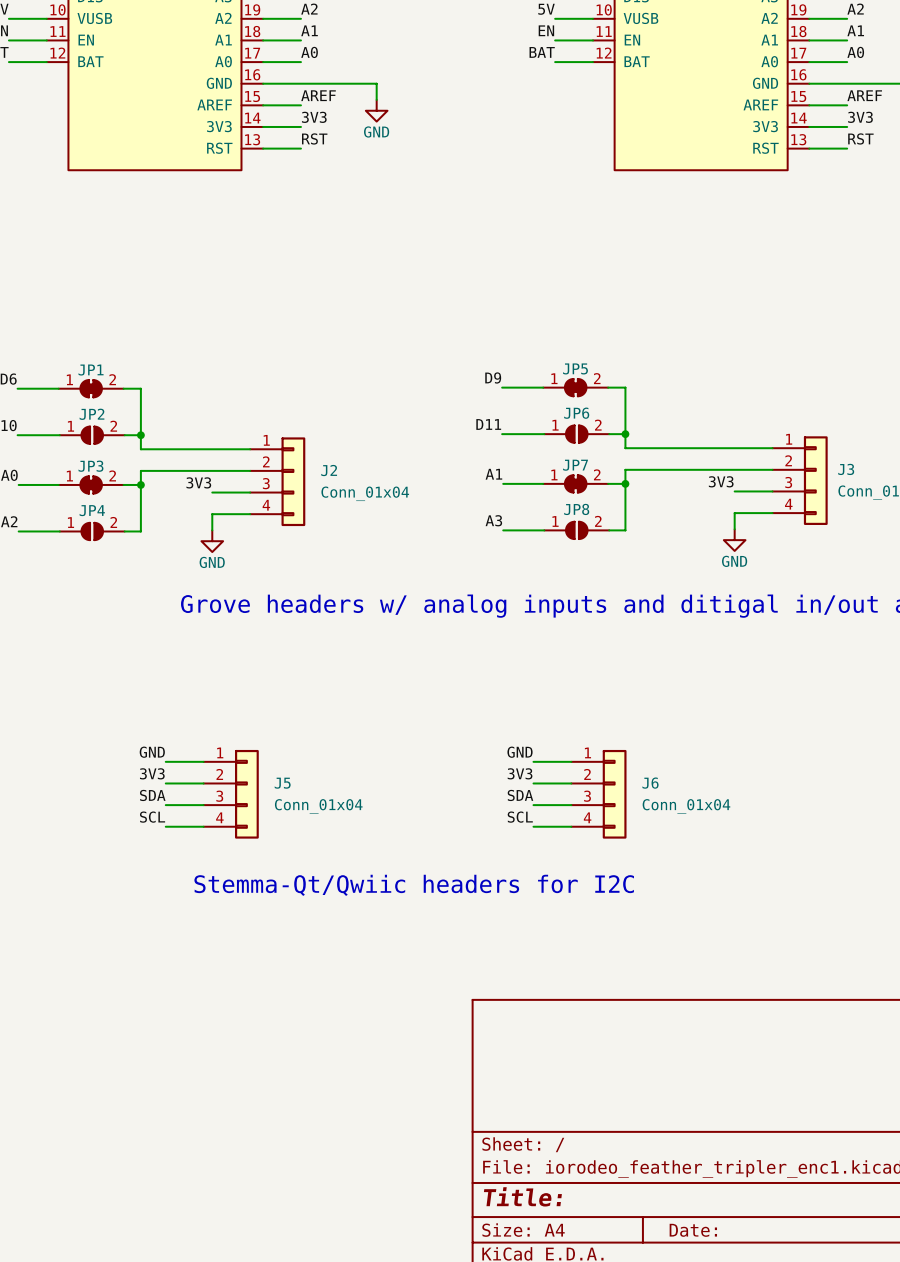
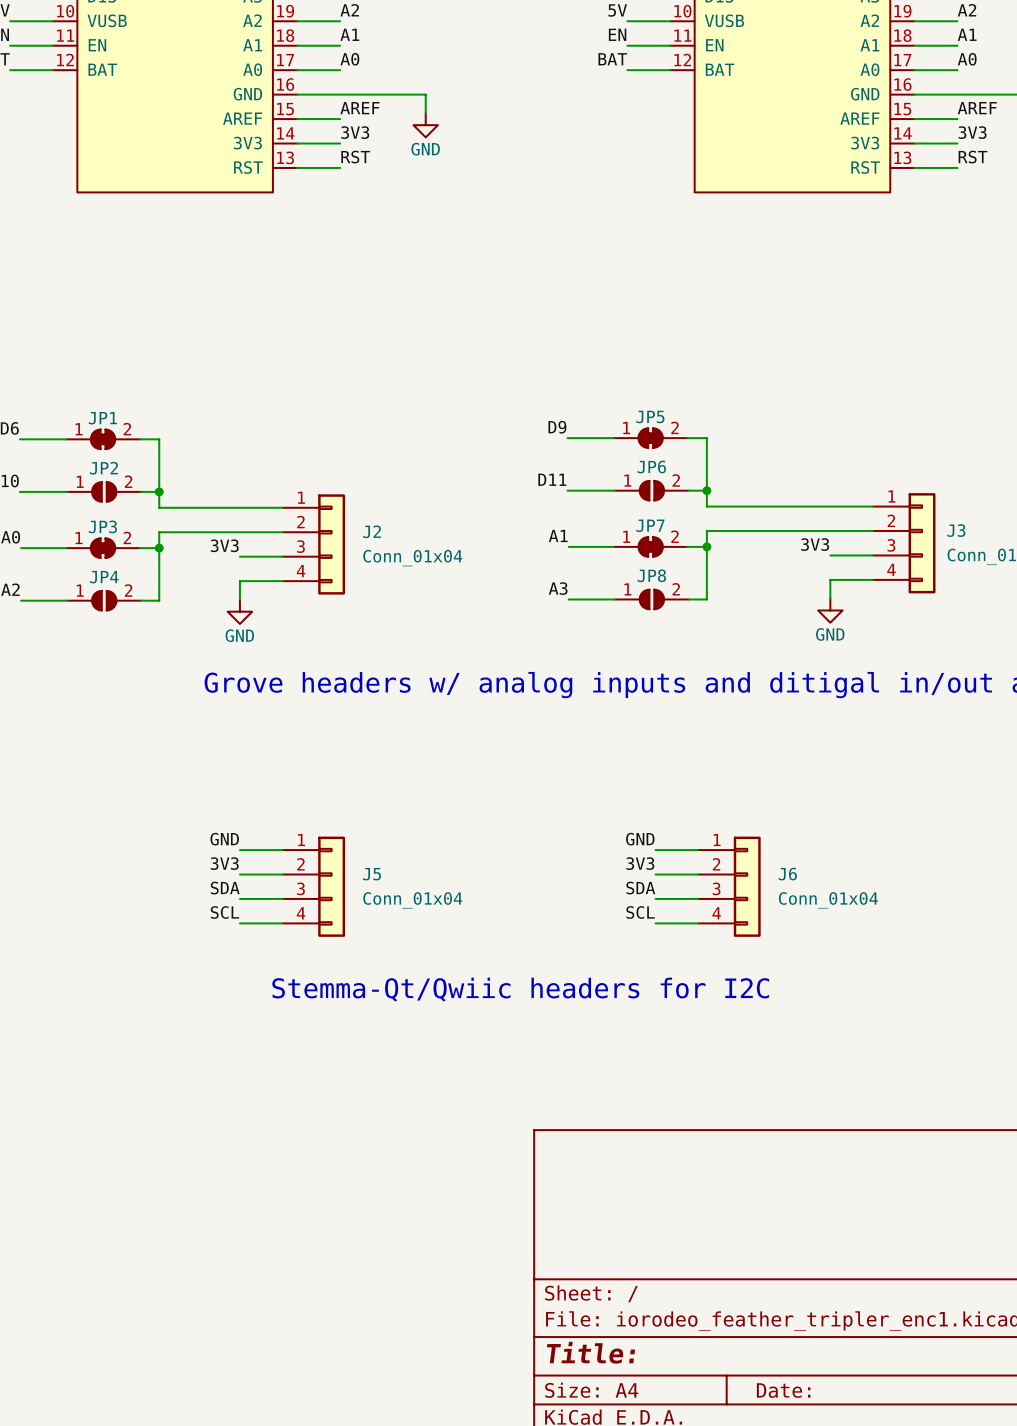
label position: GND (152, 752) -> GND (224, 839)
label position: GND (520, 752) -> GND (640, 839)
wire: (165, 761) (203, 761) -> (239, 850) (282, 850)
wire: (533, 761) (571, 761) -> (655, 850) (698, 850)
label position: 3V3 (152, 773) -> 3V3 (224, 863)
label position: 3V3 (520, 773) -> 3V3 (640, 863)
wire: (165, 783) (203, 783) -> (239, 874) (282, 874)
wire: (533, 783) (571, 783) -> (655, 874) (698, 874)
J5 position: (231, 794) -> (313, 886)
J6 position: (598, 794) -> (729, 886)
label position: SDA (152, 795) -> SDA (225, 888)
label position: SDA (520, 795) -> SDA (640, 888)
wire: (165, 805) (203, 805) -> (239, 898) (282, 898)
wire: (533, 805) (571, 805) -> (655, 898) (698, 898)
label position: SCL (152, 817) -> SCL (224, 912)
label position: SCL (520, 817) -> SCL (640, 912)
wire: (165, 826) (203, 826) -> (239, 923) (282, 923)
wire: (533, 826) (571, 826) -> (655, 923) (698, 923)
text position: Stemma-Qt/Qwiic headers for I2C (414, 885) -> Stemma-Qt/Qwiic headers for I2C (520, 989)

